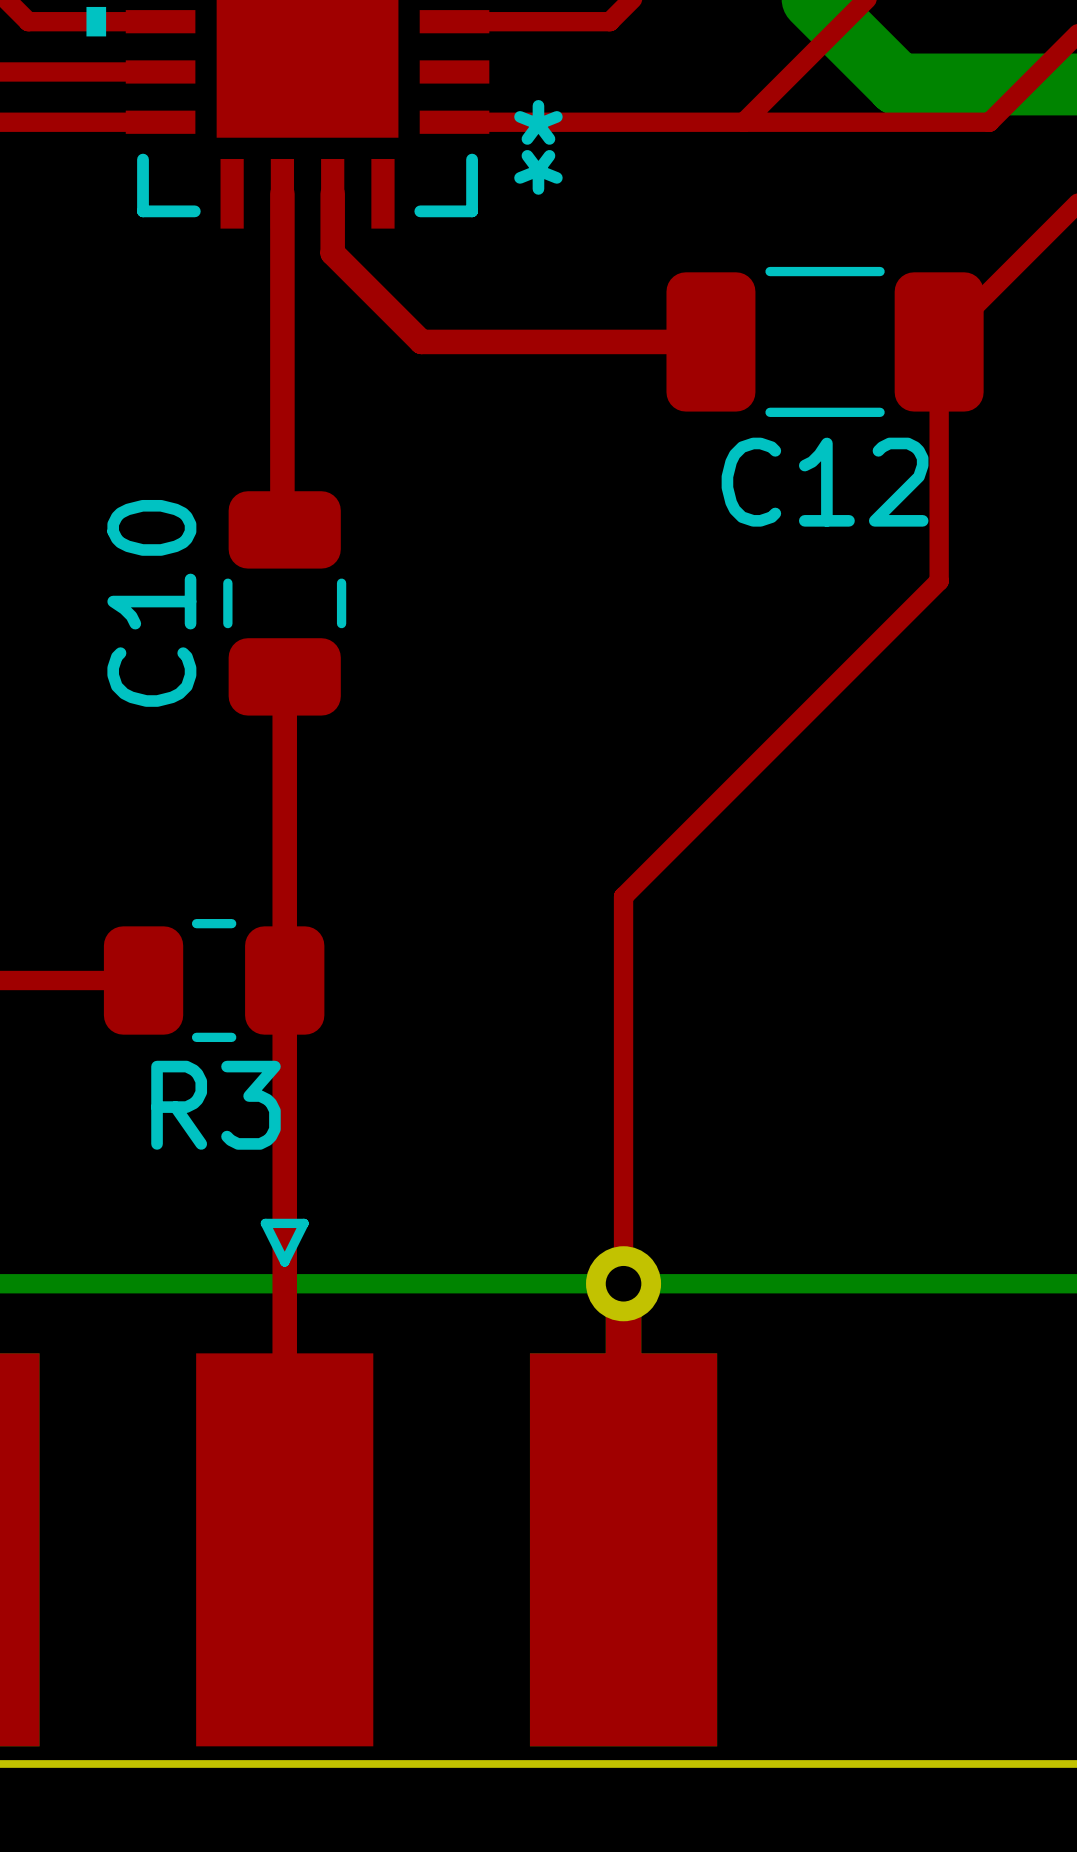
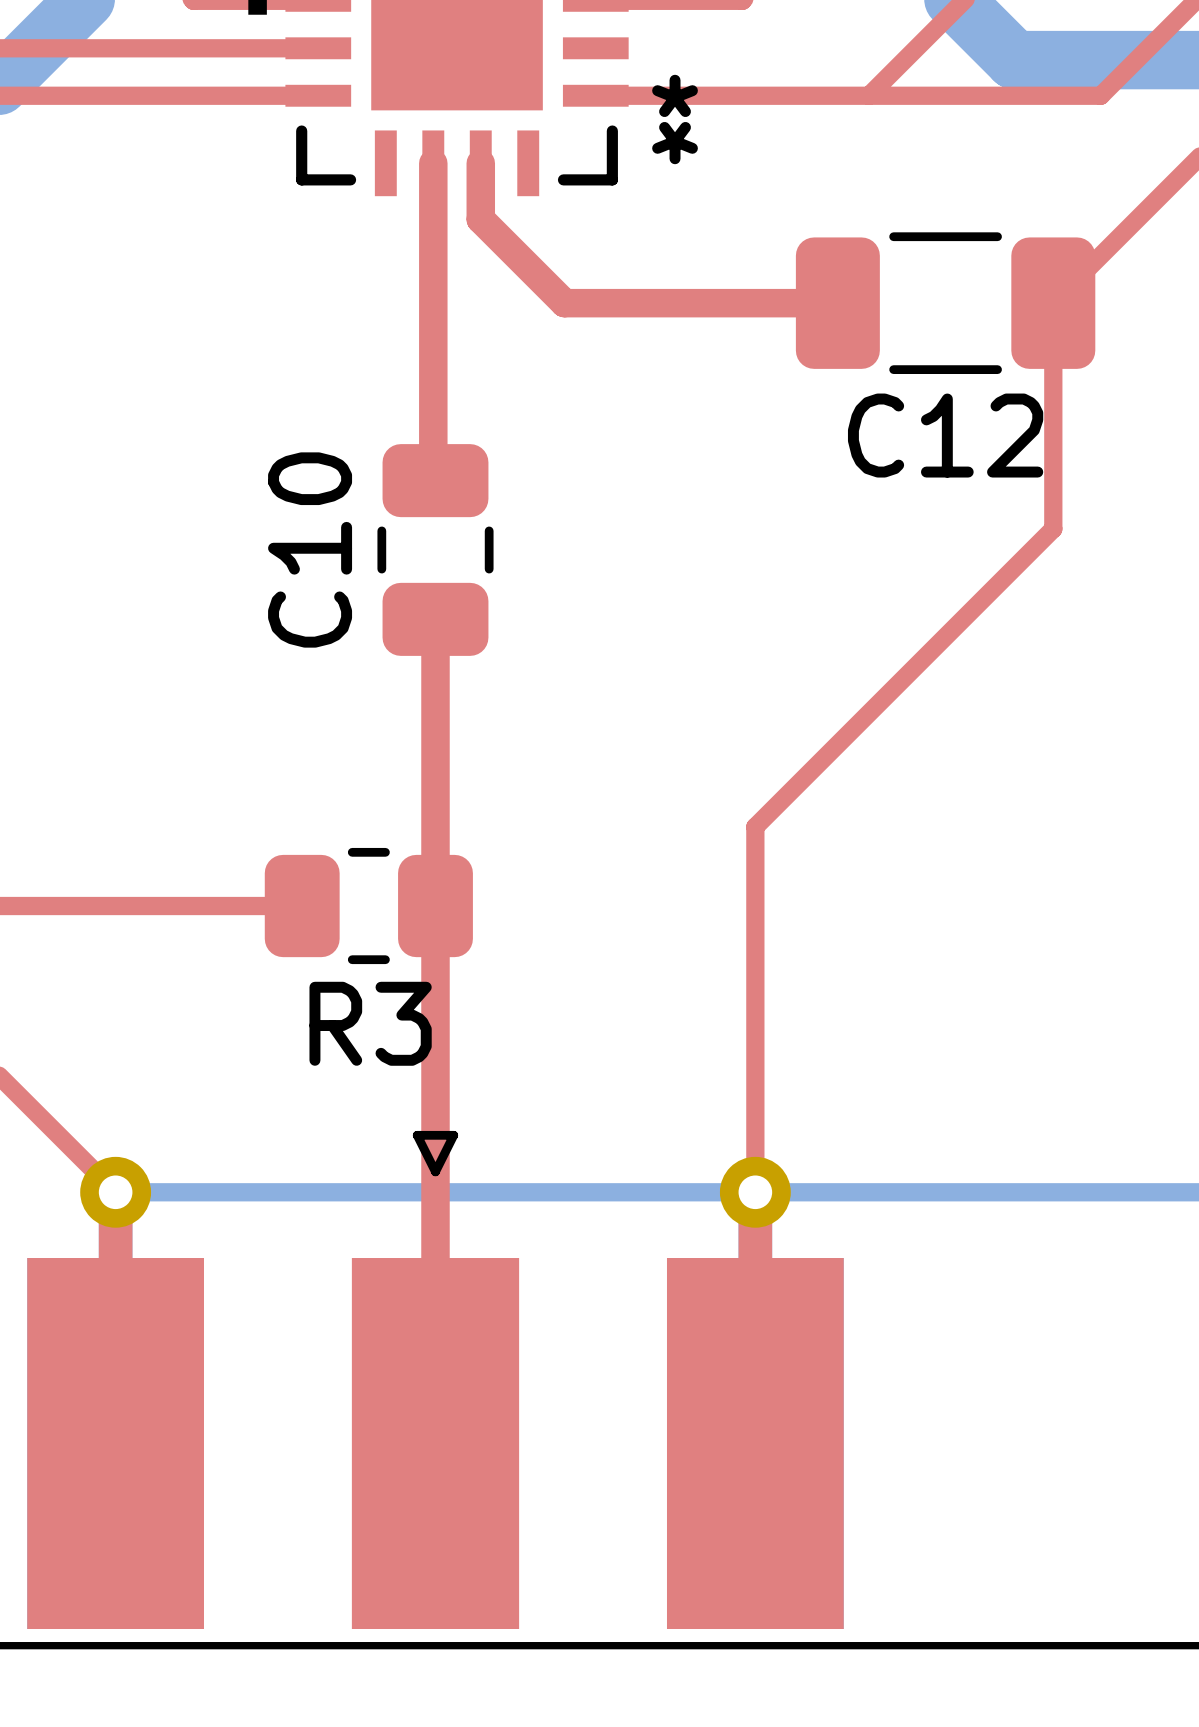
top track width: thin (282, 193) (282, 527) (284, 529) -> thick (433, 163) (433, 478) (435, 480)
top track width: thin (332, 193) (332, 253) (421, 341) (710, 341) -> thick (480, 163) (480, 219) (564, 303) (837, 303)
top track width: thin (284, 676) (284, 1549) -> thick (435, 619) (435, 1443)

